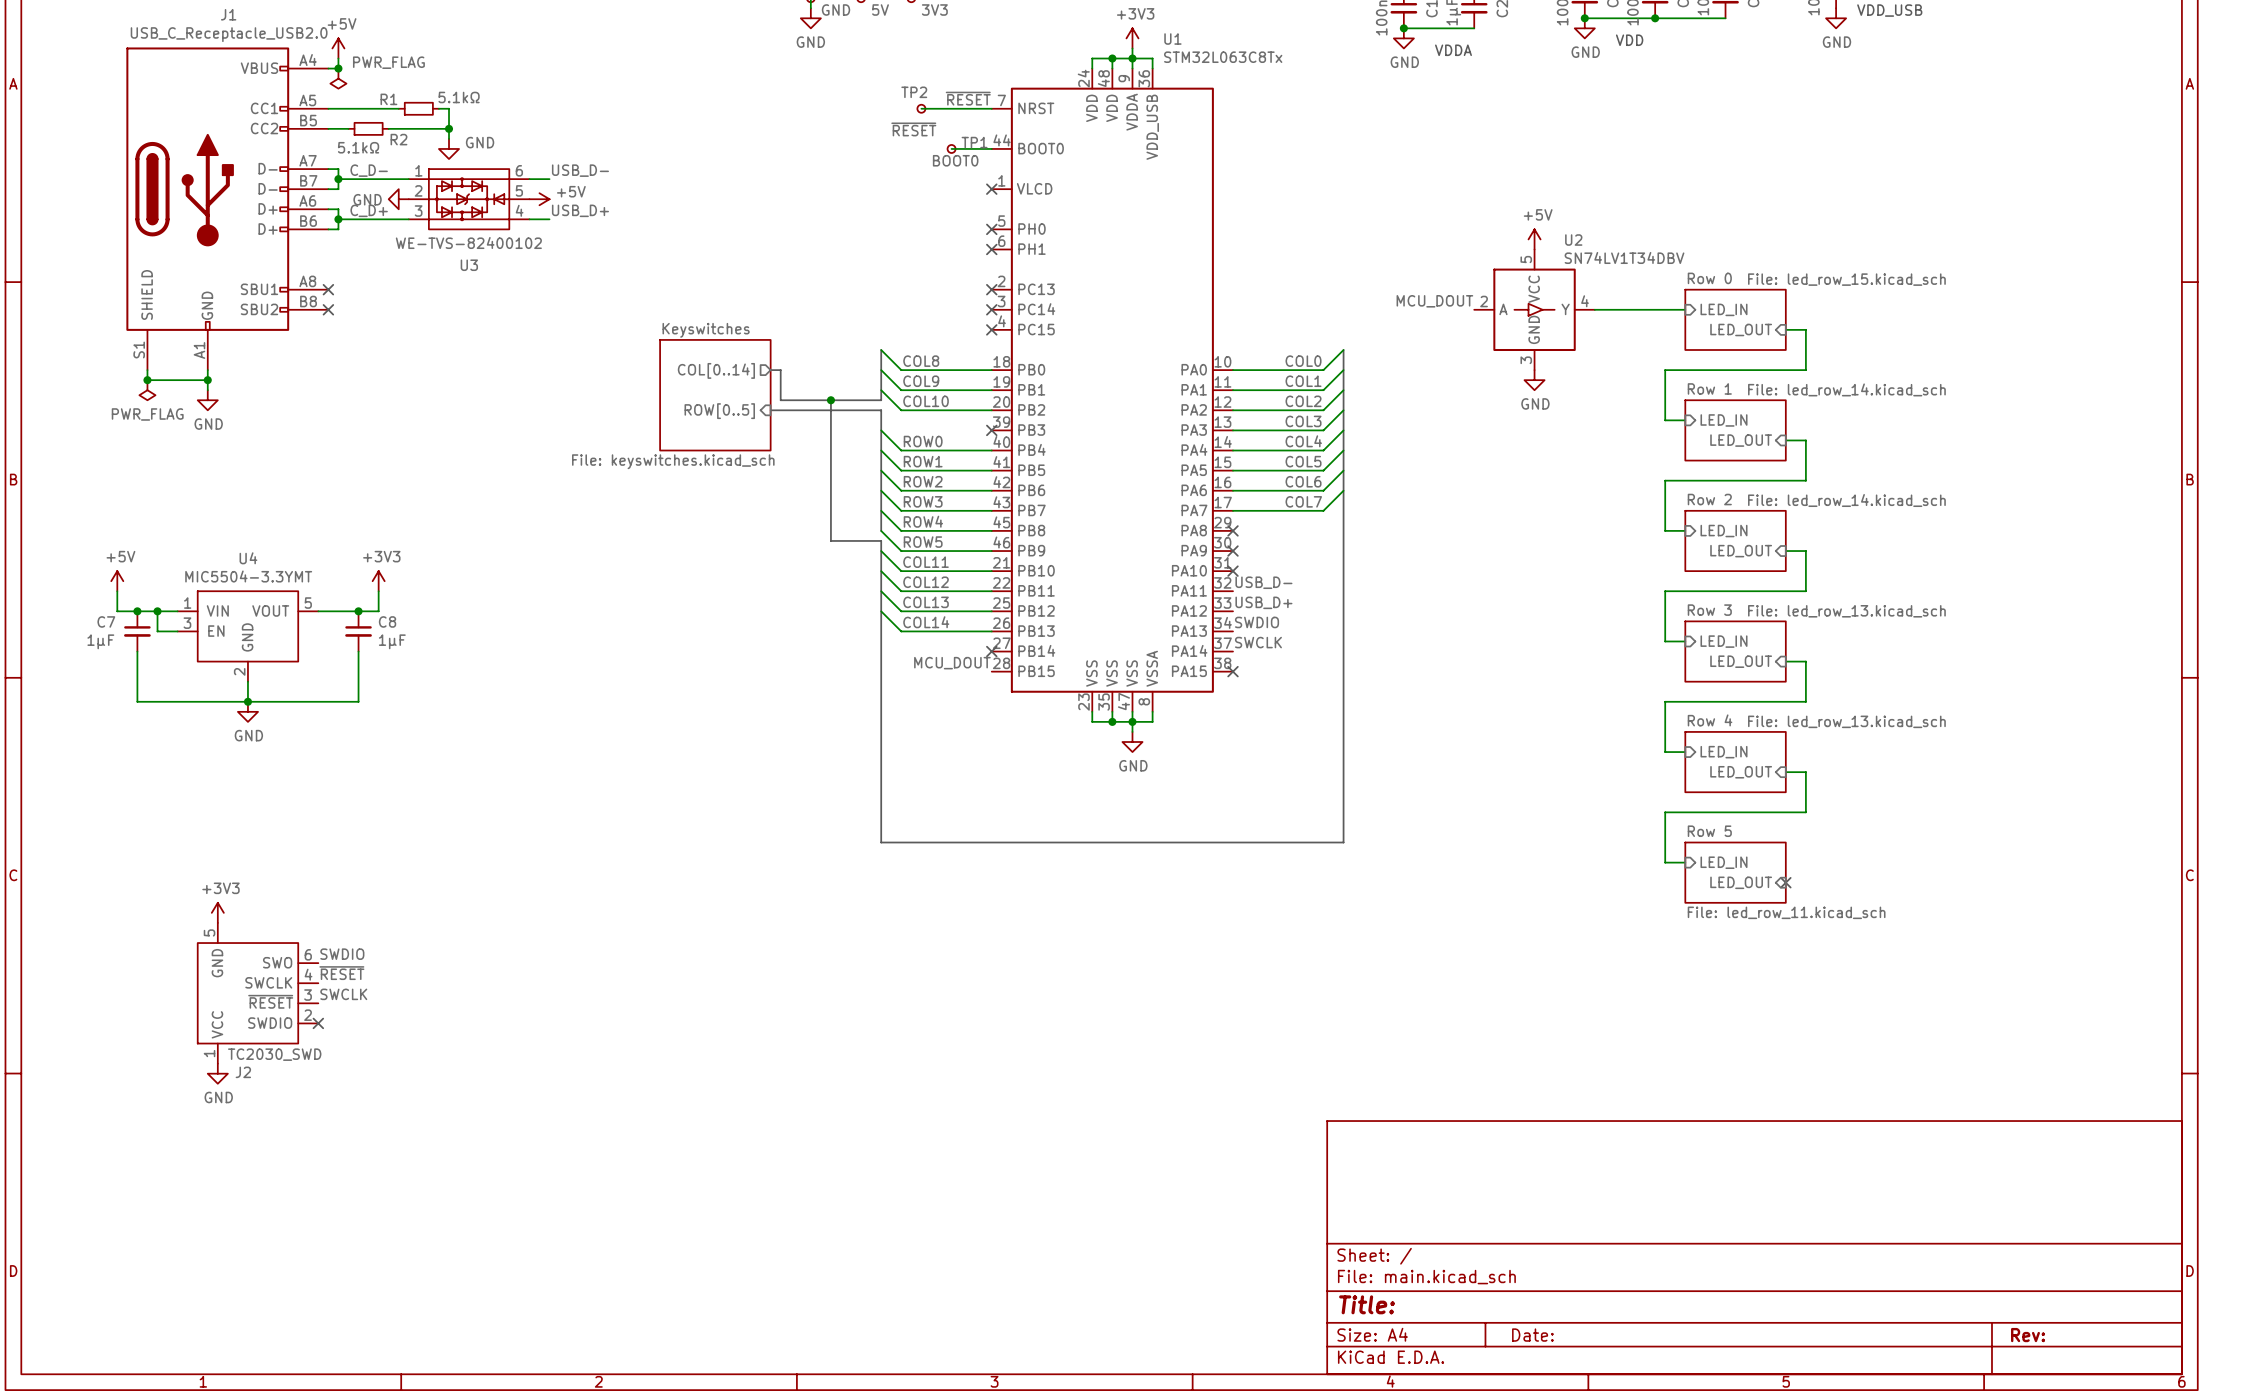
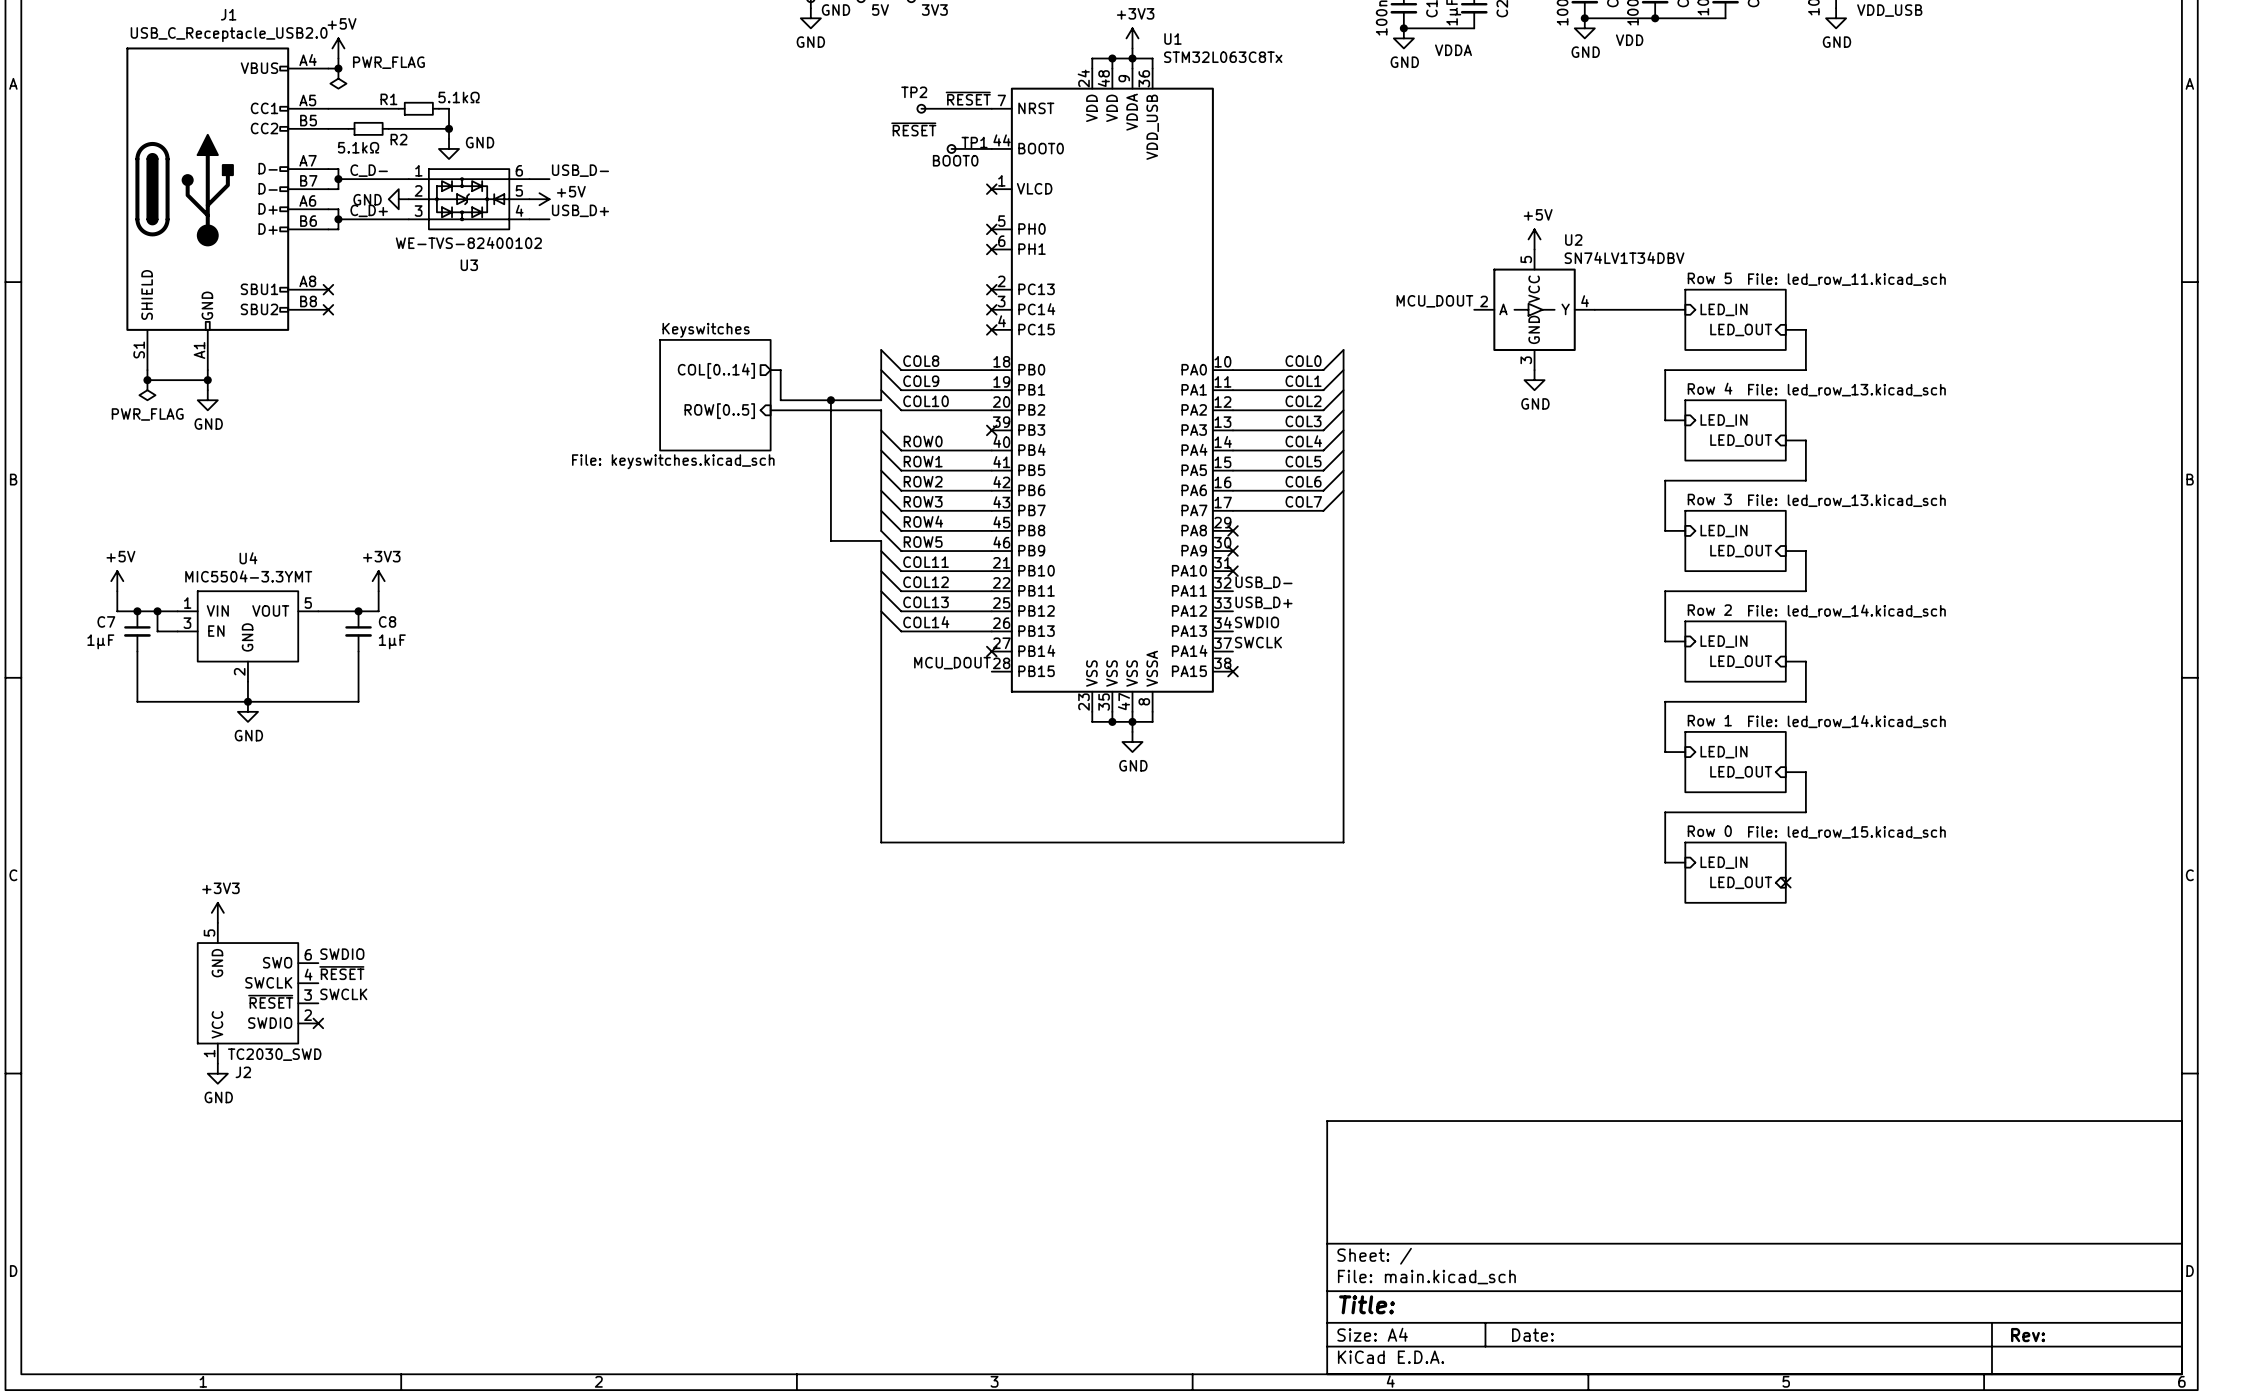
sheet Row 0 name: Row 0 (1709, 278) -> Row 5 (1709, 278)
sheet Row 0 value: File: led_row_15.kicad_sch (1846, 279) -> File: led_row_11.kicad_sch (1846, 279)
sheet Row 1 name: Row 1 (1709, 388) -> Row 4 (1710, 388)
sheet Row 1 value: File: led_row_14.kicad_sch (1846, 389) -> File: led_row_13.kicad_sch (1846, 390)
sheet Row 2 name: Row 2 (1709, 499) -> Row 3 (1709, 499)
sheet Row 2 value: File: led_row_14.kicad_sch (1846, 500) -> File: led_row_13.kicad_sch (1846, 500)
sheet Row 3 name: Row 3 (1709, 610) -> Row 2 (1709, 610)
sheet Row 3 value: File: led_row_13.kicad_sch (1846, 611) -> File: led_row_14.kicad_sch (1846, 611)
sheet Row 4 name: Row 4 (1710, 720) -> Row 1 (1709, 720)
sheet Row 4 value: File: led_row_13.kicad_sch (1846, 721) -> File: led_row_14.kicad_sch (1846, 721)
sheet Row 5 name: Row 5 (1709, 831) -> Row 0 (1709, 831)
sheet Row 5 value: File: led_row_11.kicad_sch (1786, 912) -> File: led_row_15.kicad_sch (1846, 832)

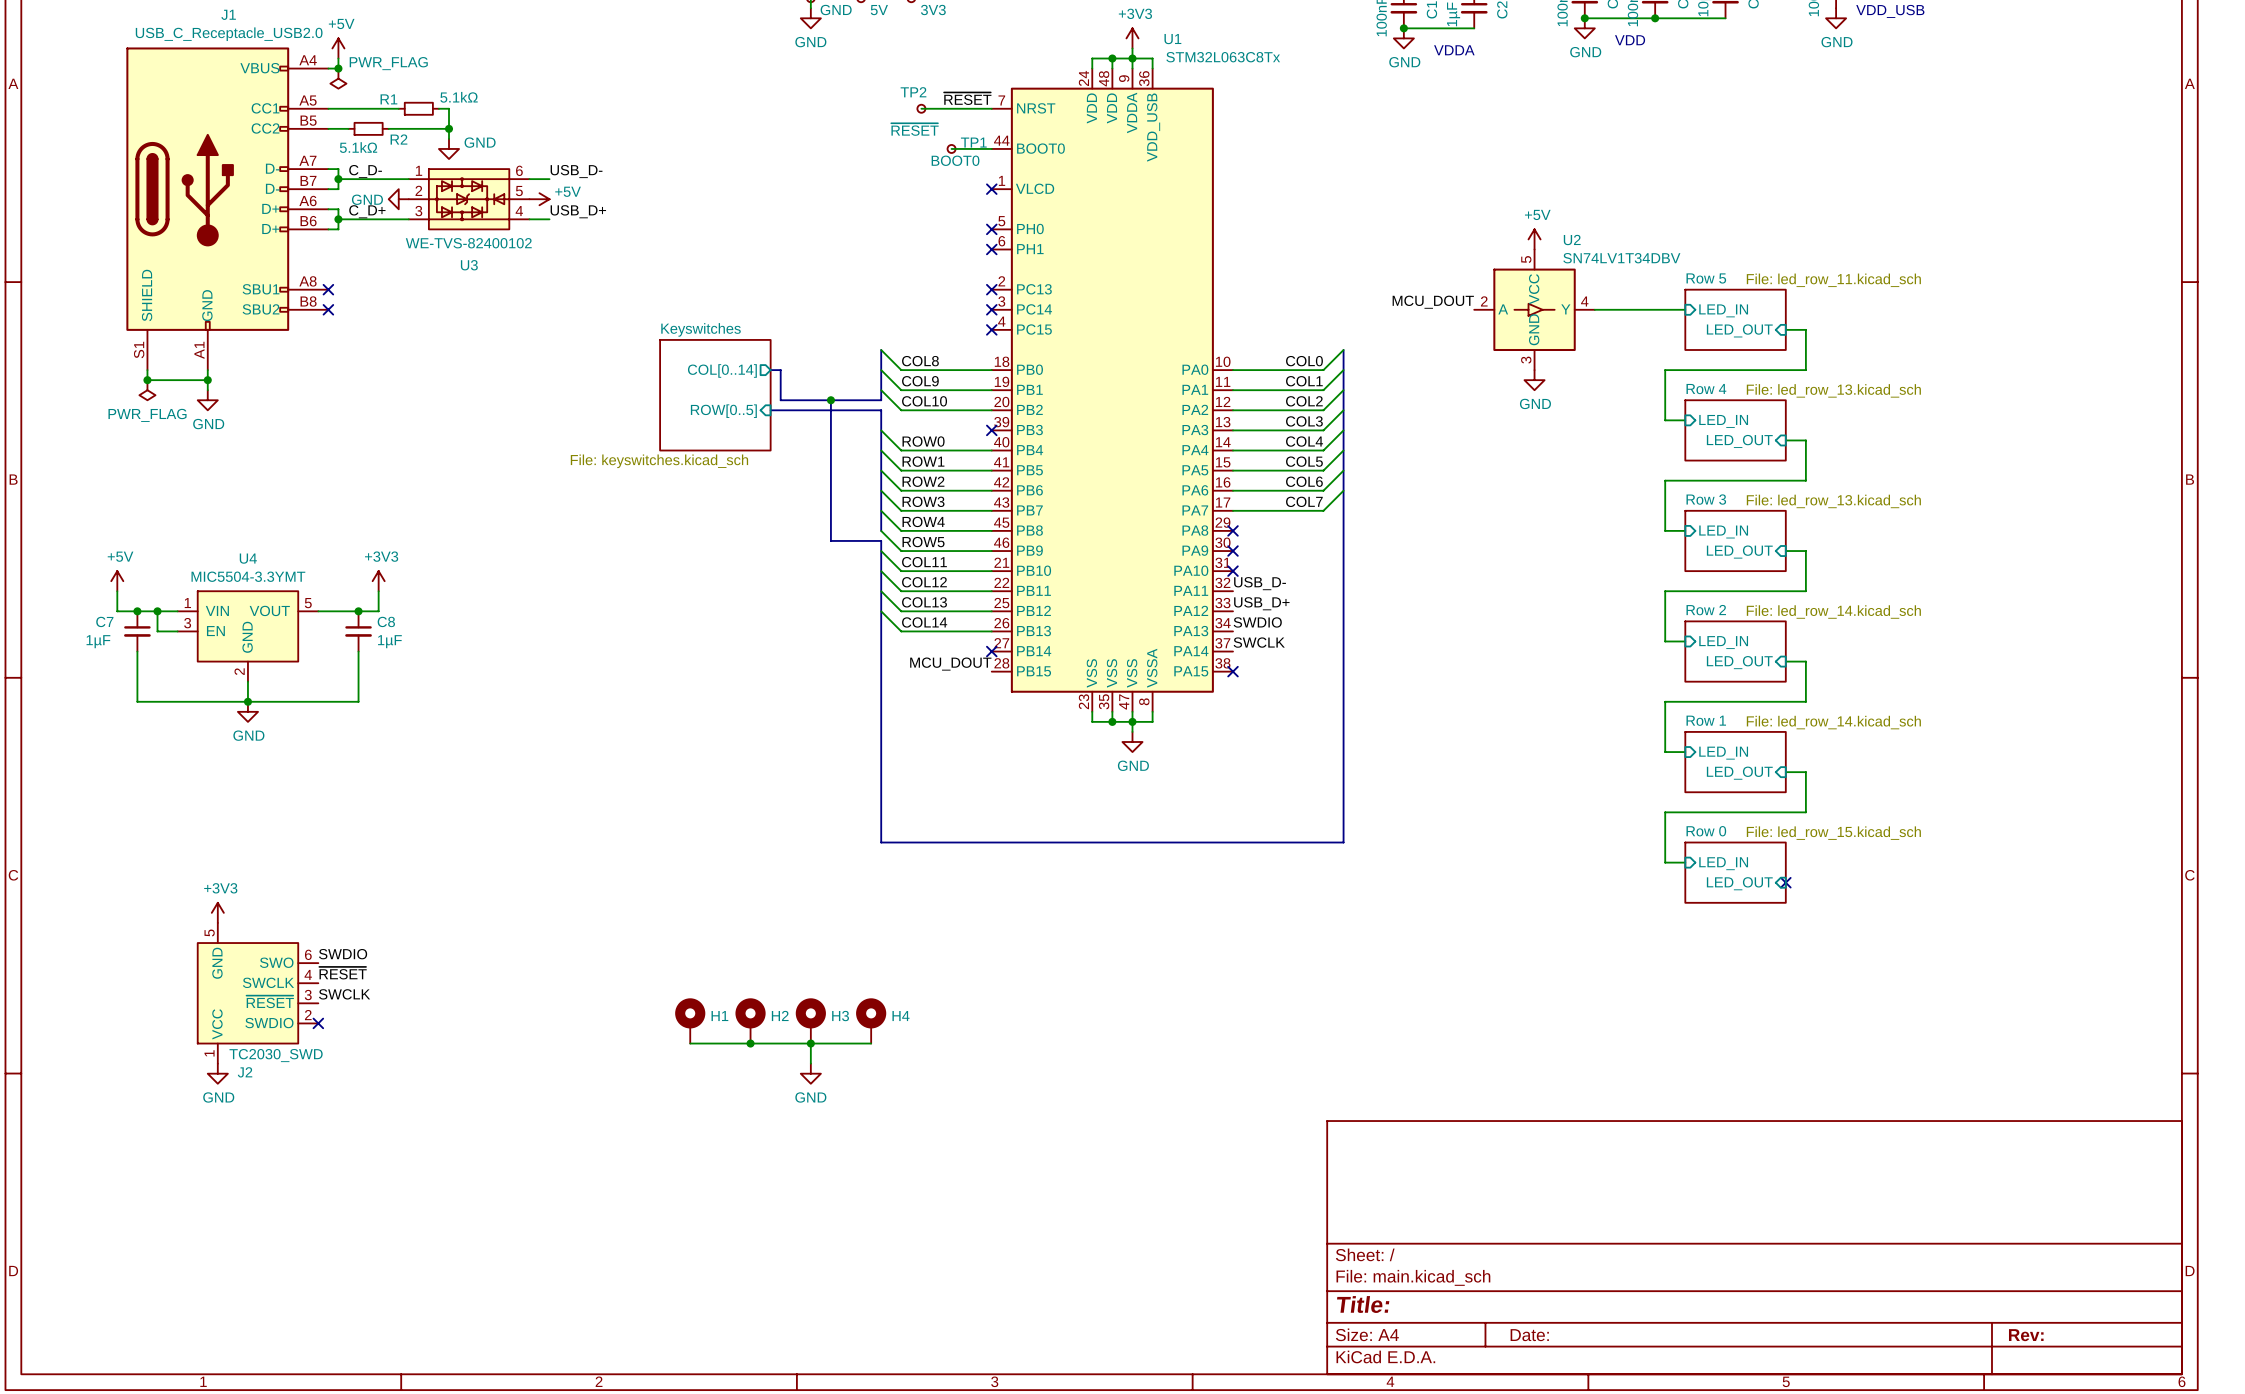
H1: none -> (690, 1020)
H2: none -> (750, 1020)
H3: none -> (810, 1020)
H4: none -> (871, 1020)
wire: none -> (690, 1043) (871, 1043)
junction: none -> (750, 1043)
wire: none -> (810, 1043) (810, 1063)
junction: none -> (810, 1043)
power symbol: none -> GND (810, 1073)

